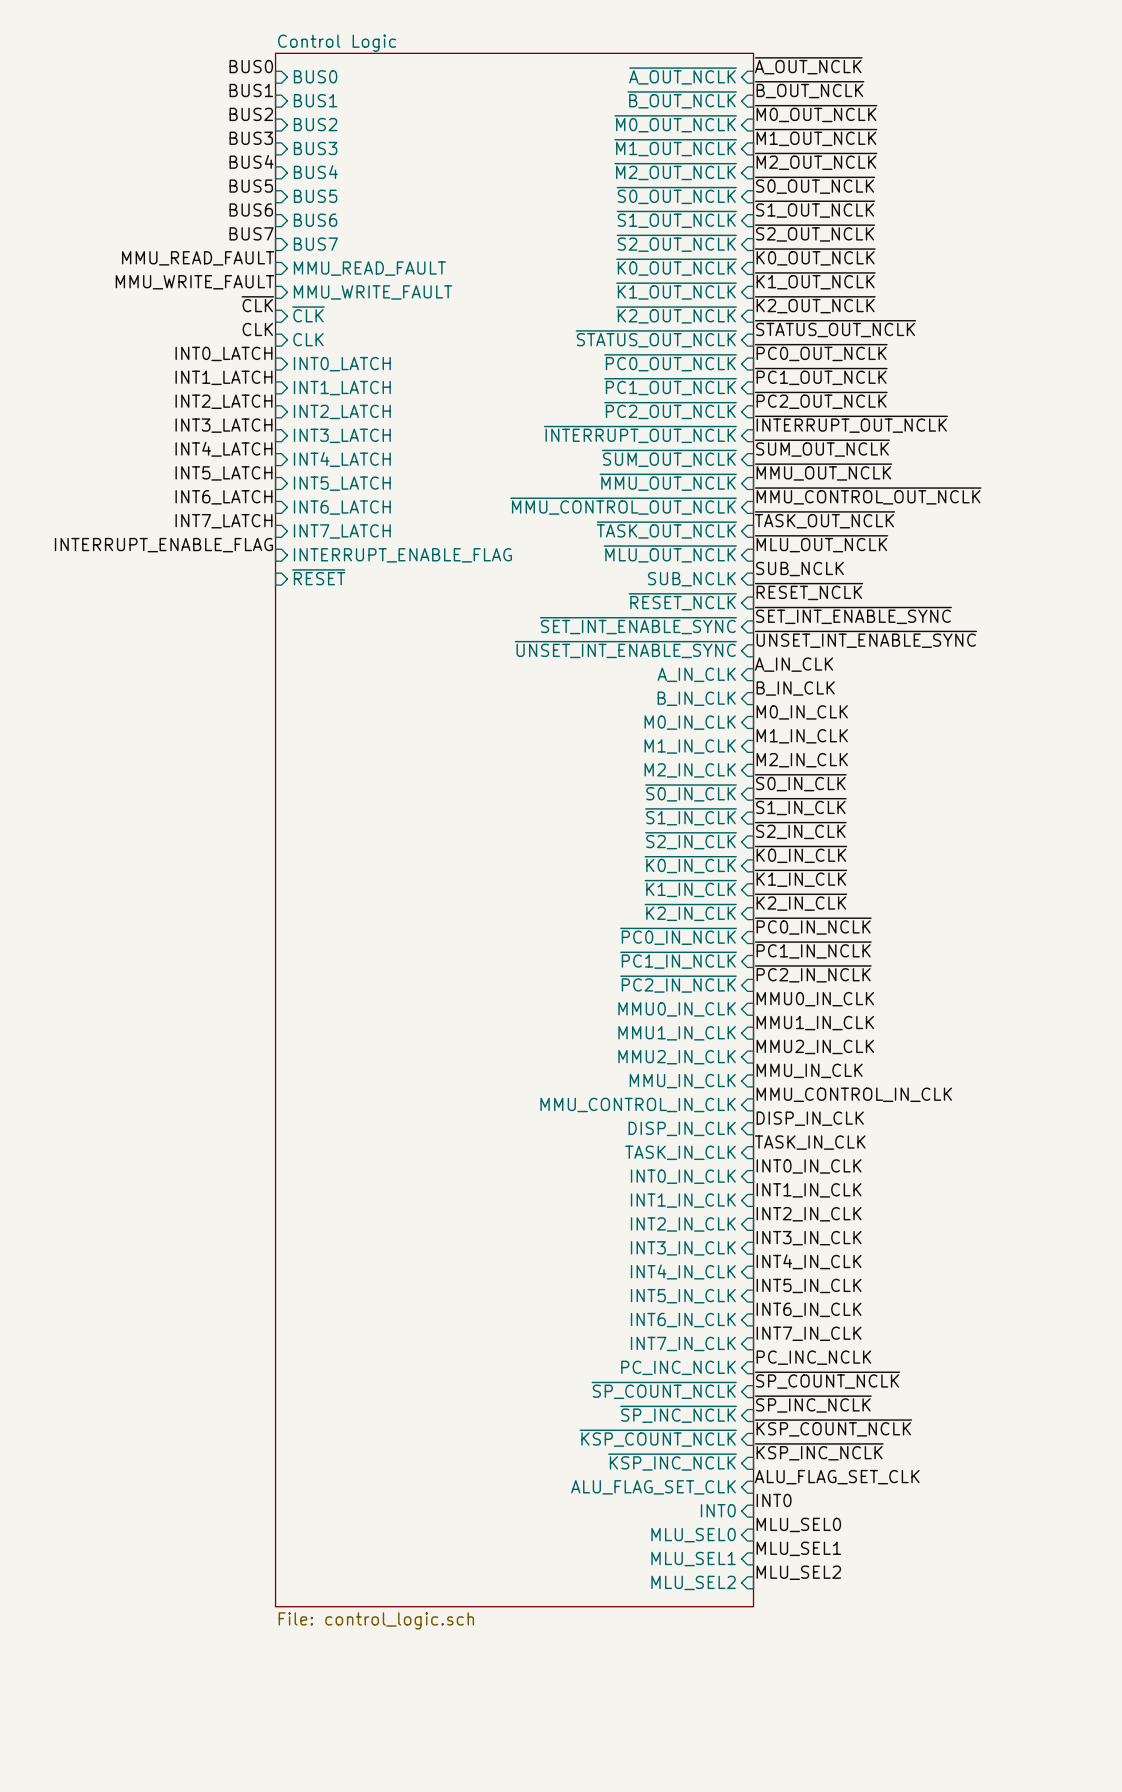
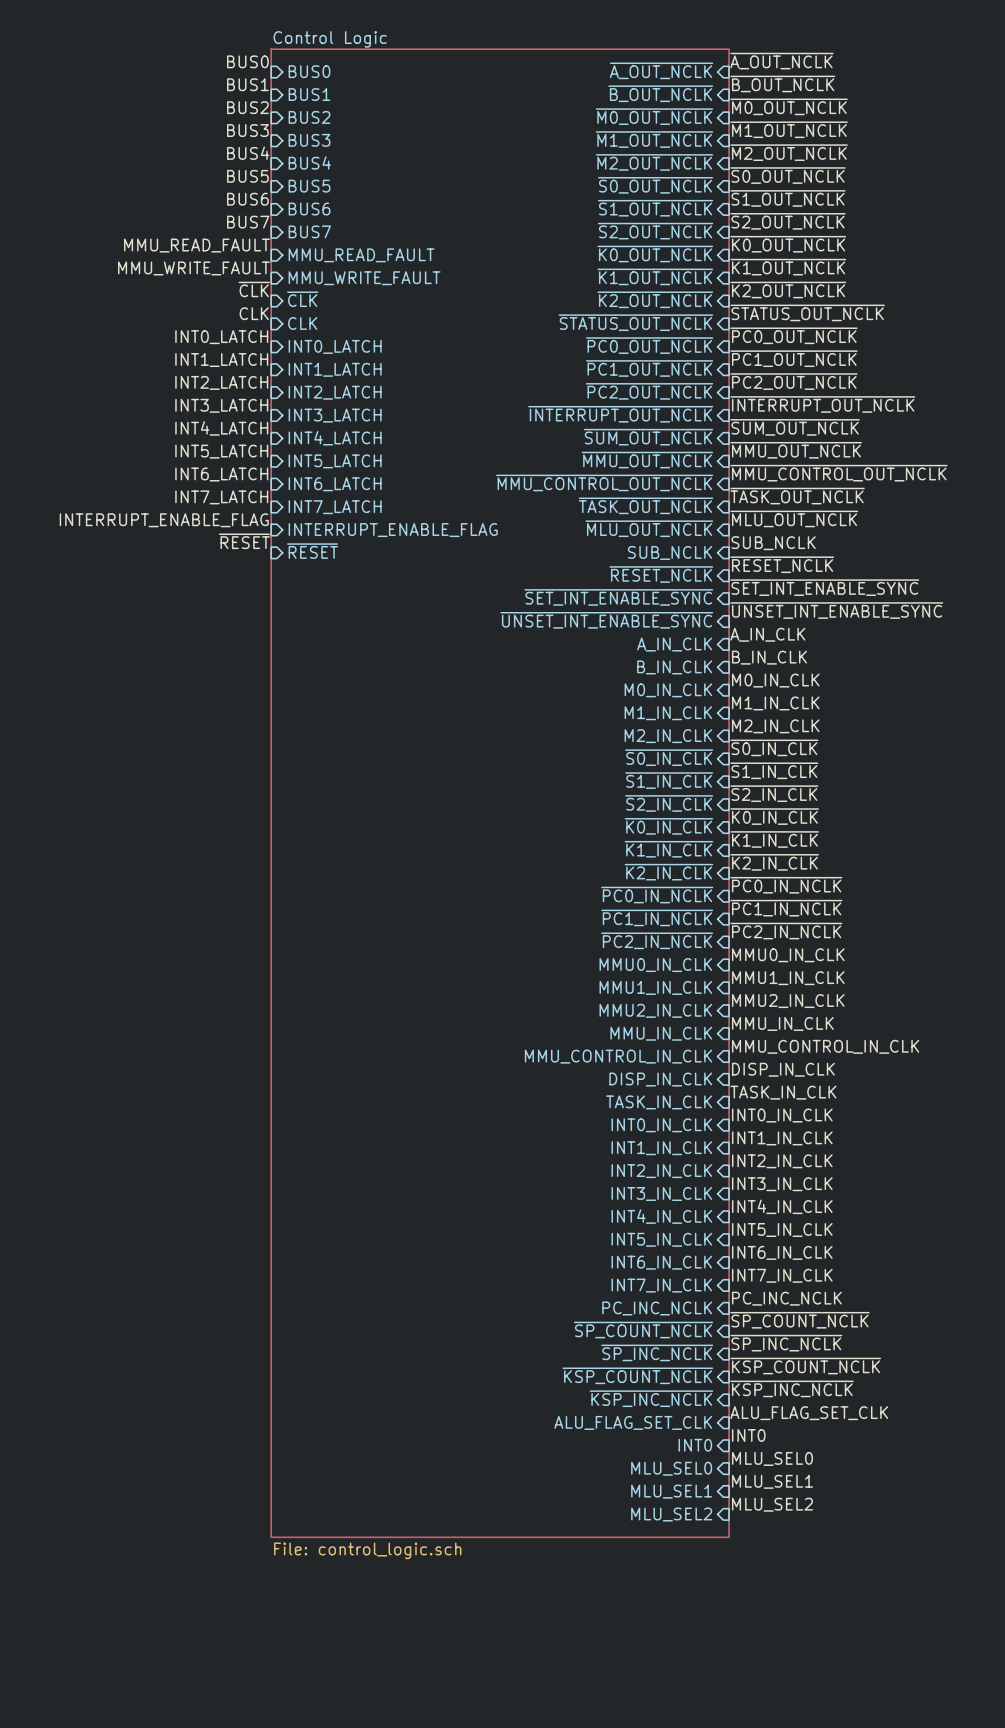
label: none -> ~{RESET} (244, 541)

